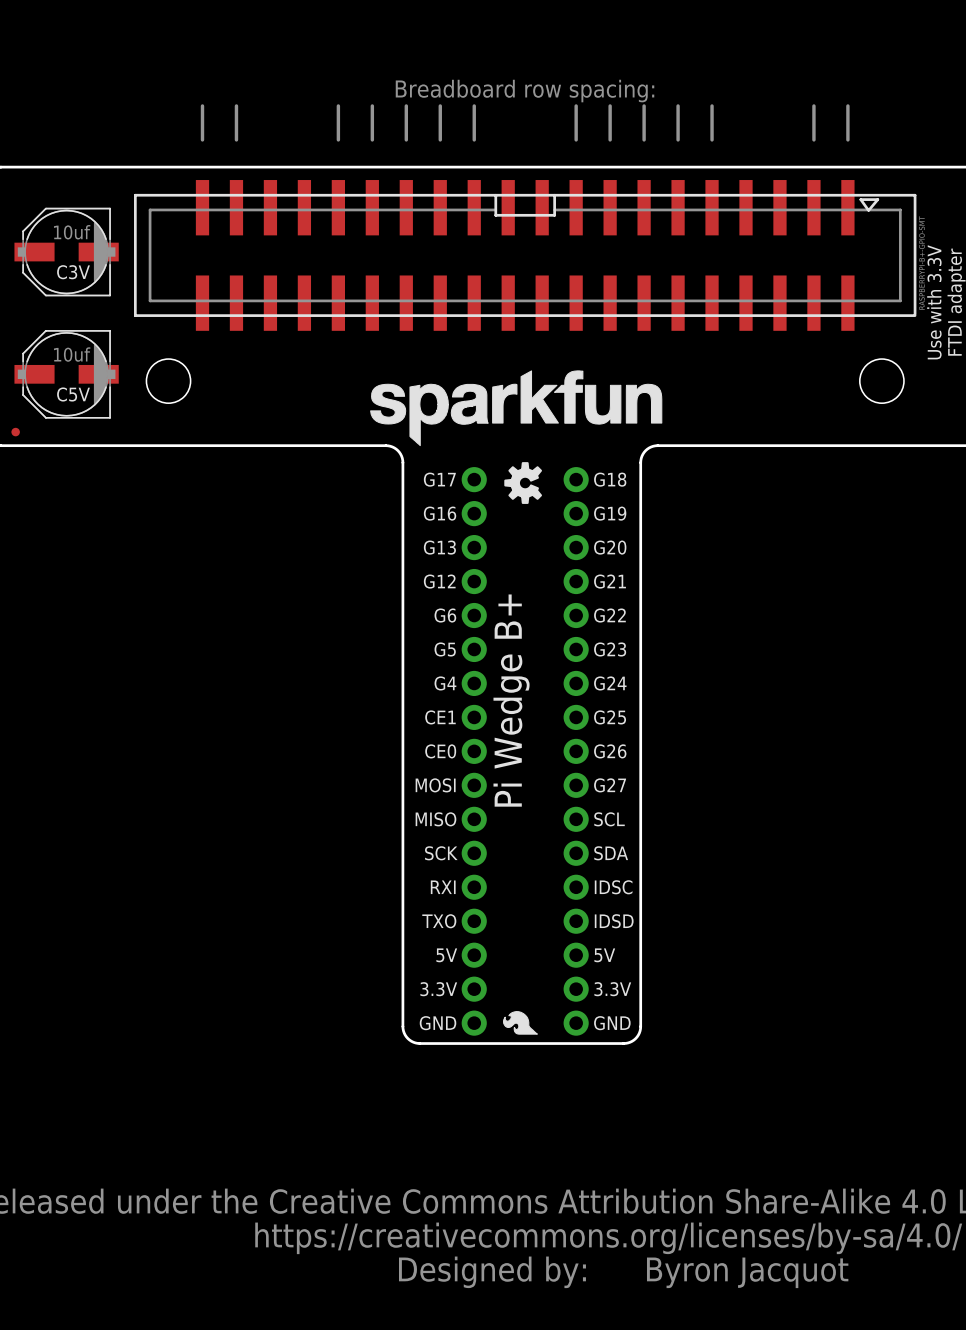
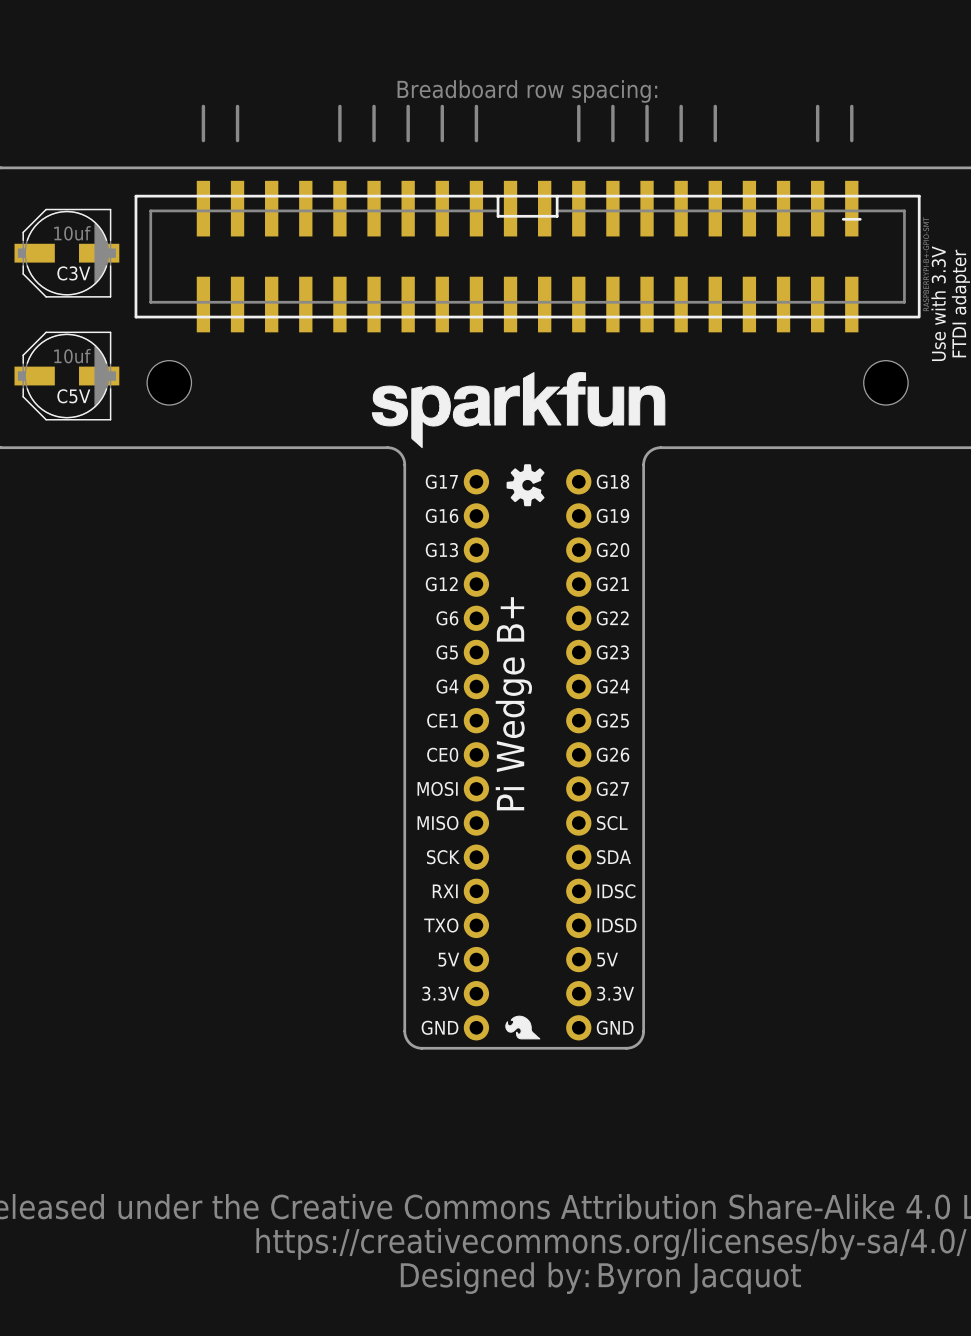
part footprint: [133, 180, 917, 331] -> [134, 180, 921, 333]
part: (15, 432) -> none
text position: Byron Jacquot (747, 1272) -> Byron Jacquot (699, 1278)

